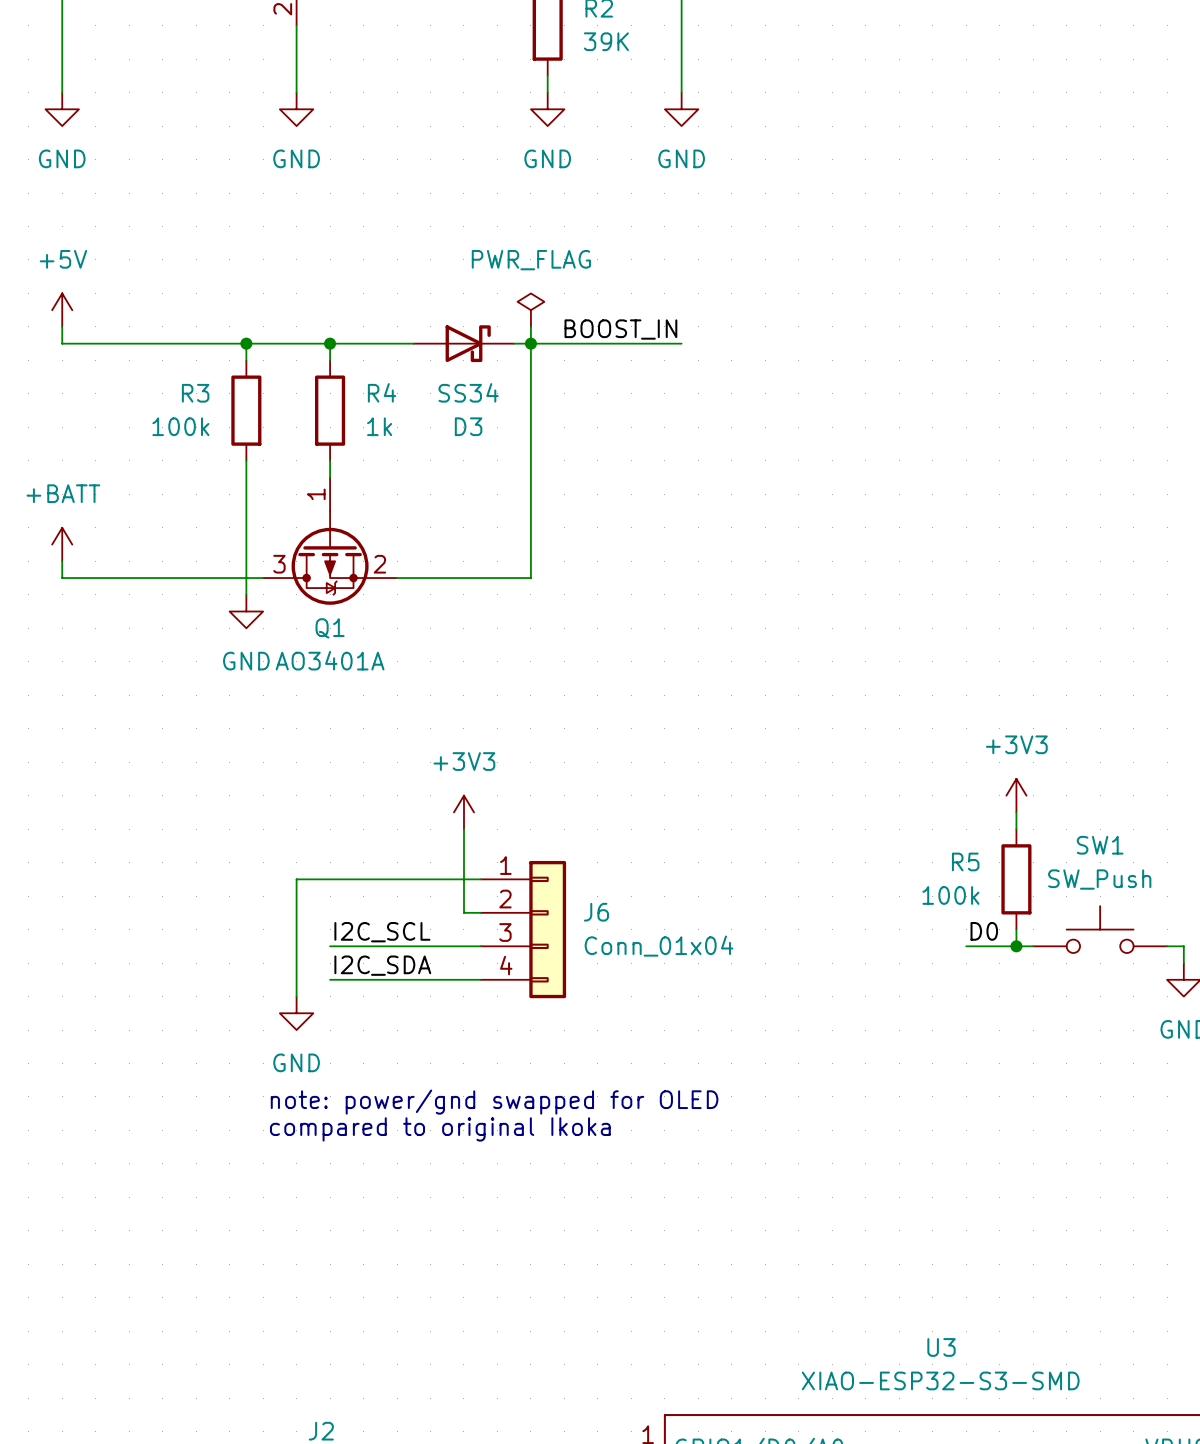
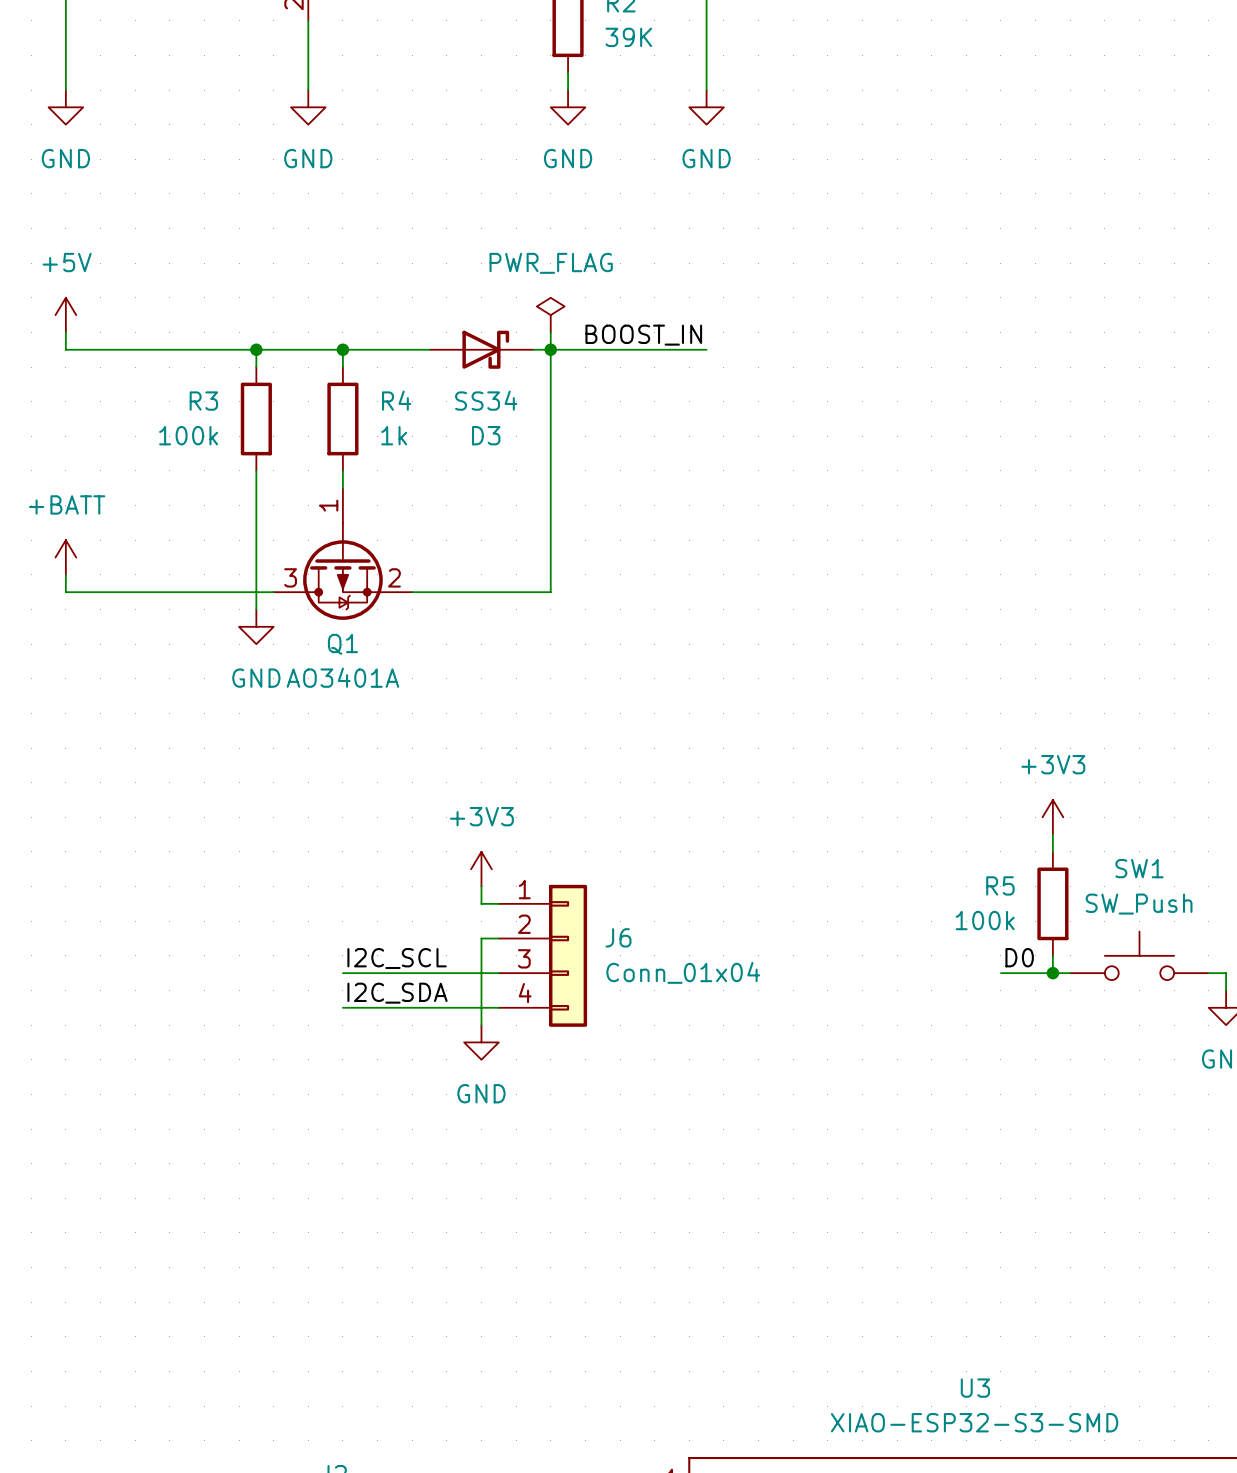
power symbol position: +3V3 (463, 812) -> +3V3 (481, 869)
wire: (463, 912) (463, 879) (296, 879) (296, 996) -> (481, 938) (481, 1025)
power symbol position: GND (296, 1013) -> GND (481, 1042)
text: note: power/gnd swapped for OLED (494, 1102) -> none
text: compared to original Ikoka (440, 1129) -> none

